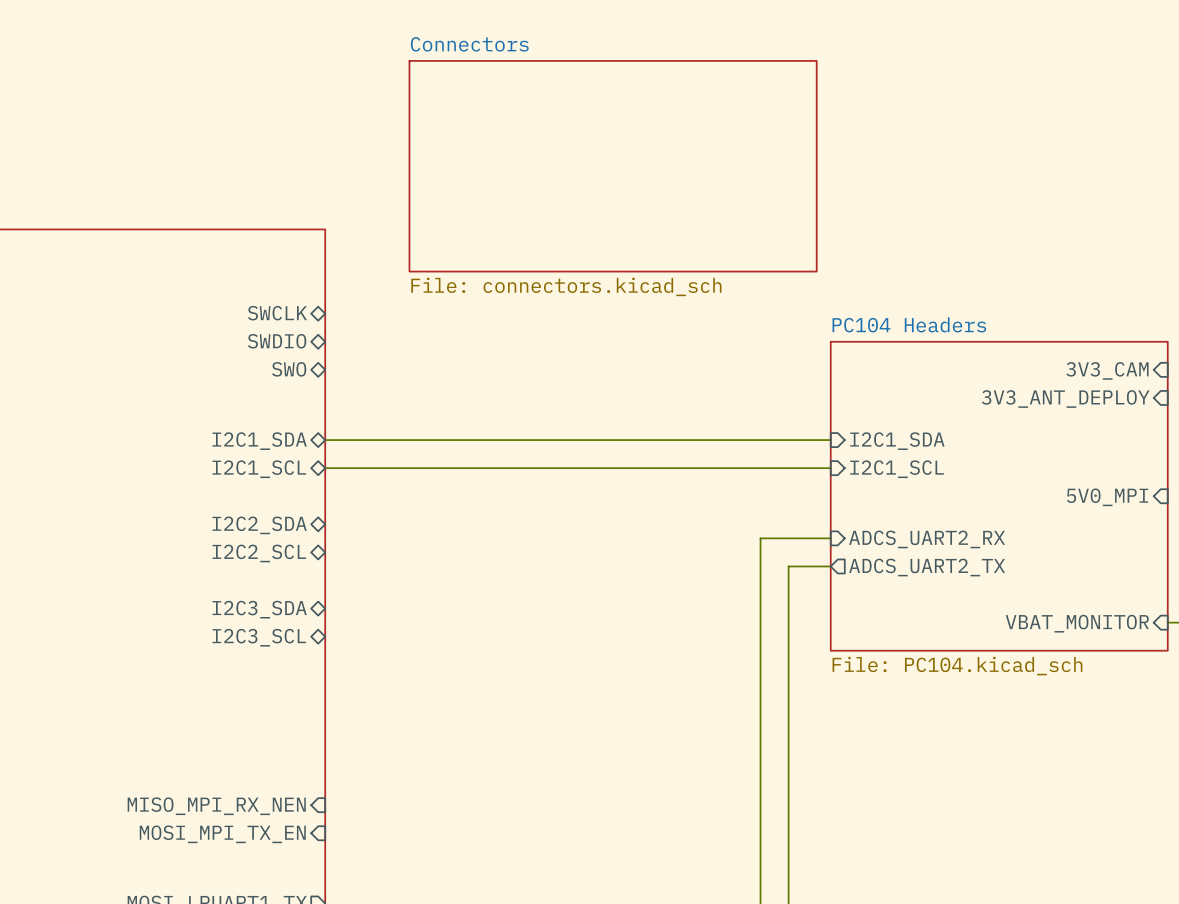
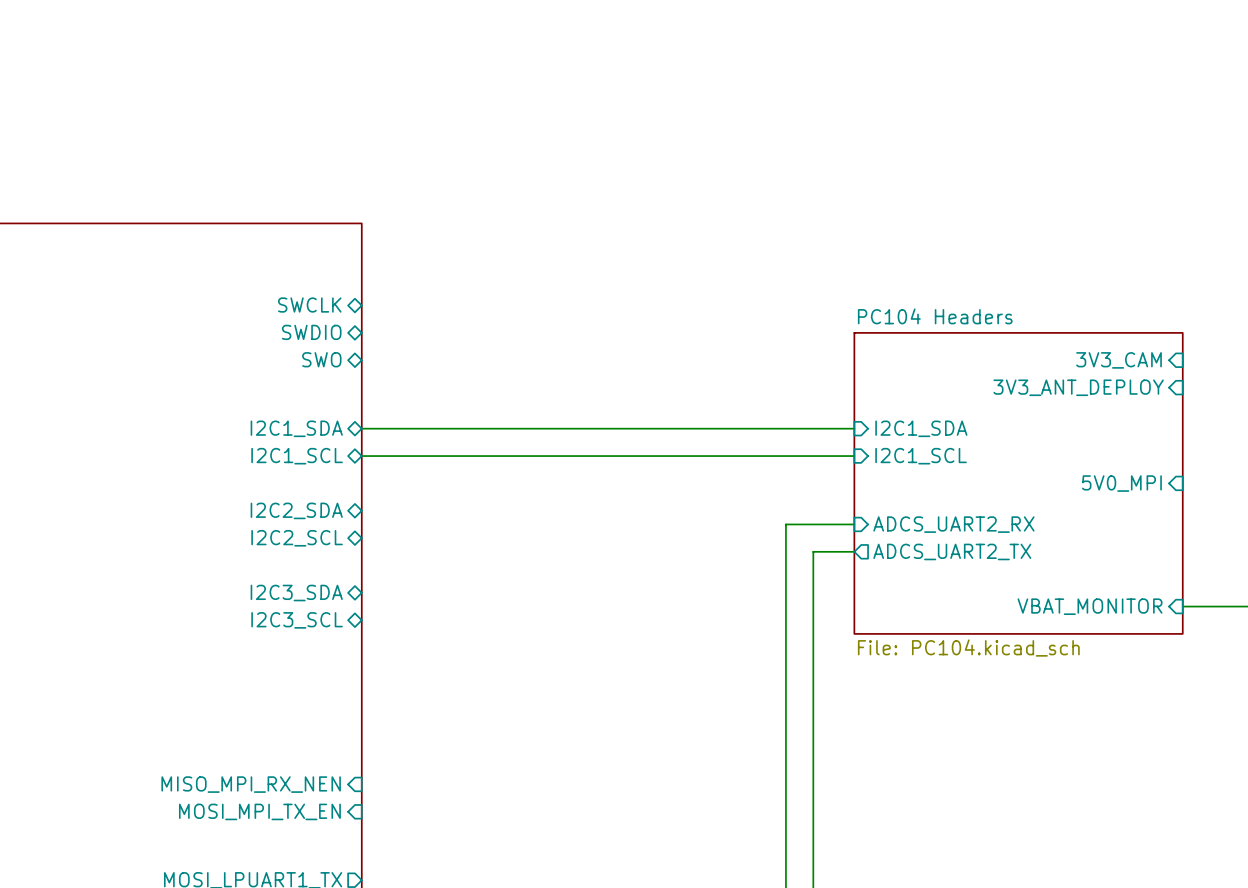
sheet Connectors: File: connectors.kicad_sch (613, 166) -> none

